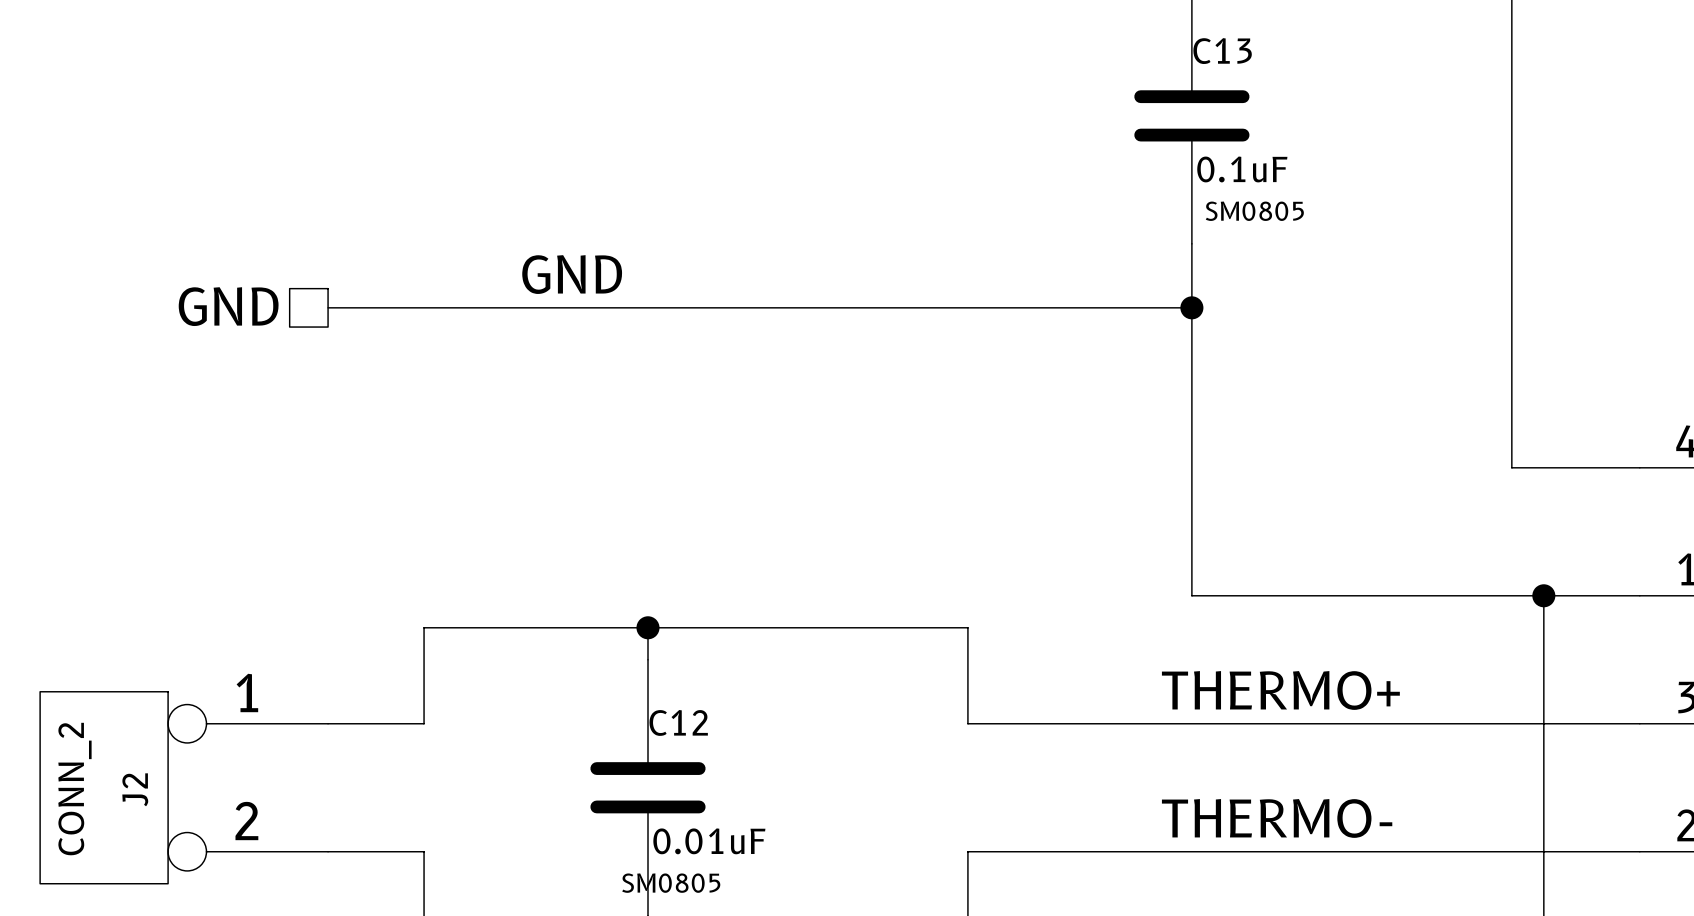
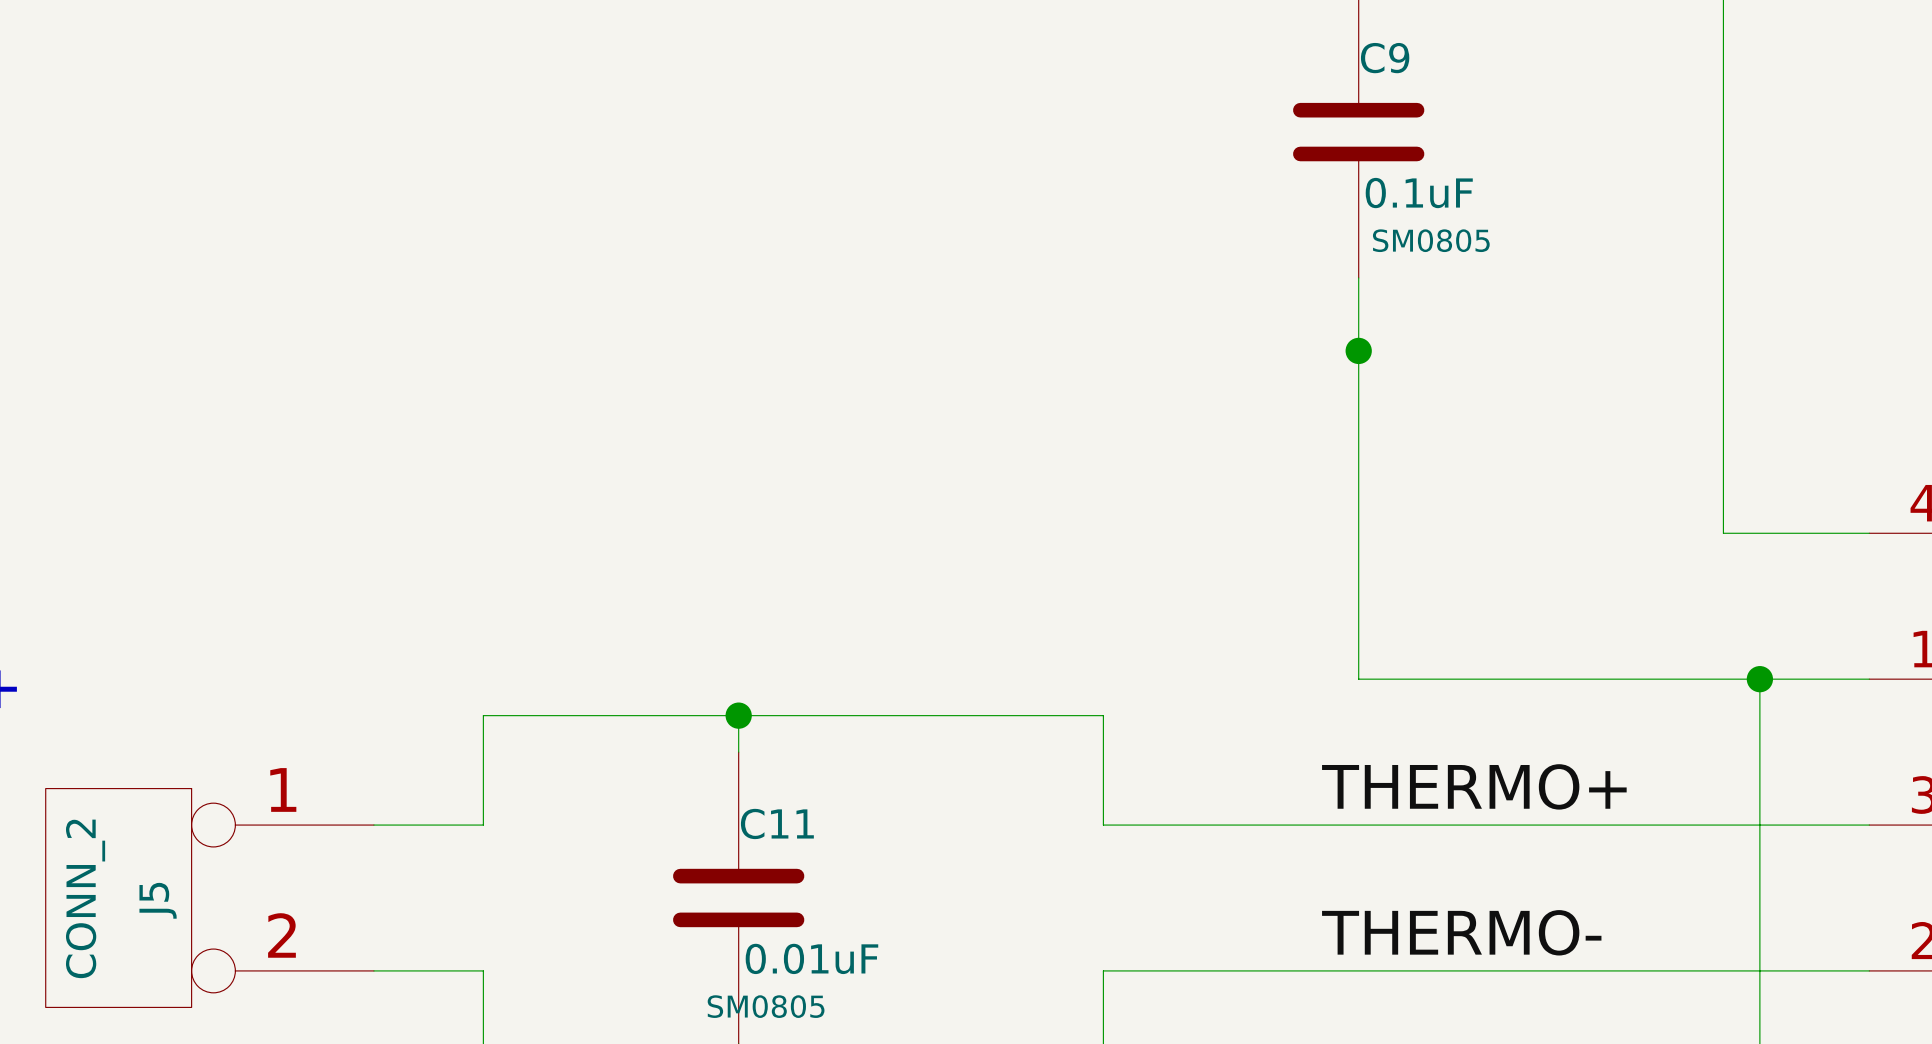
C13 name: C13 (1222, 51) -> C9 (1385, 58)
label: GND (572, 274) -> none
hierarchical label: GND (228, 306) -> none
wire: (328, 307) (1191, 307) -> none
C12 name: C12 (678, 722) -> C11 (777, 823)
J2 name: J2 (135, 789) -> J5 (158, 900)

